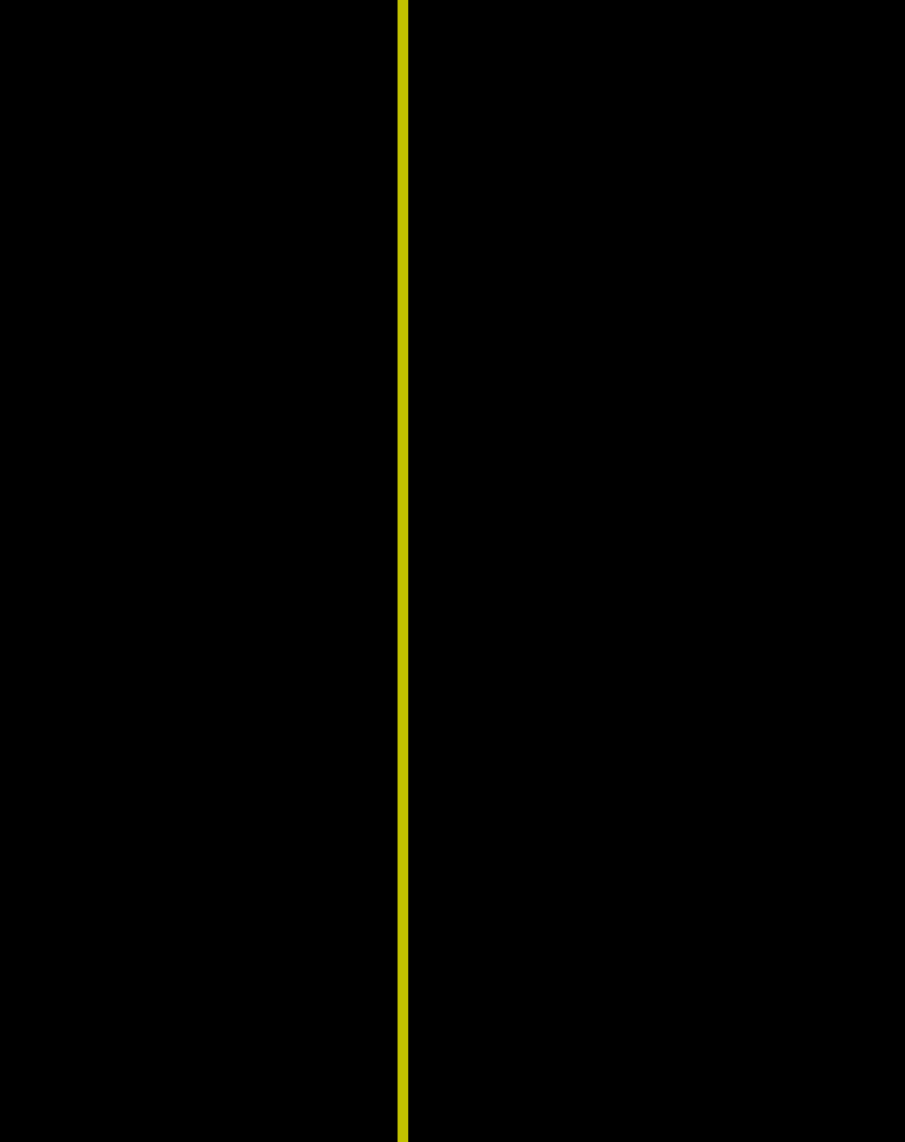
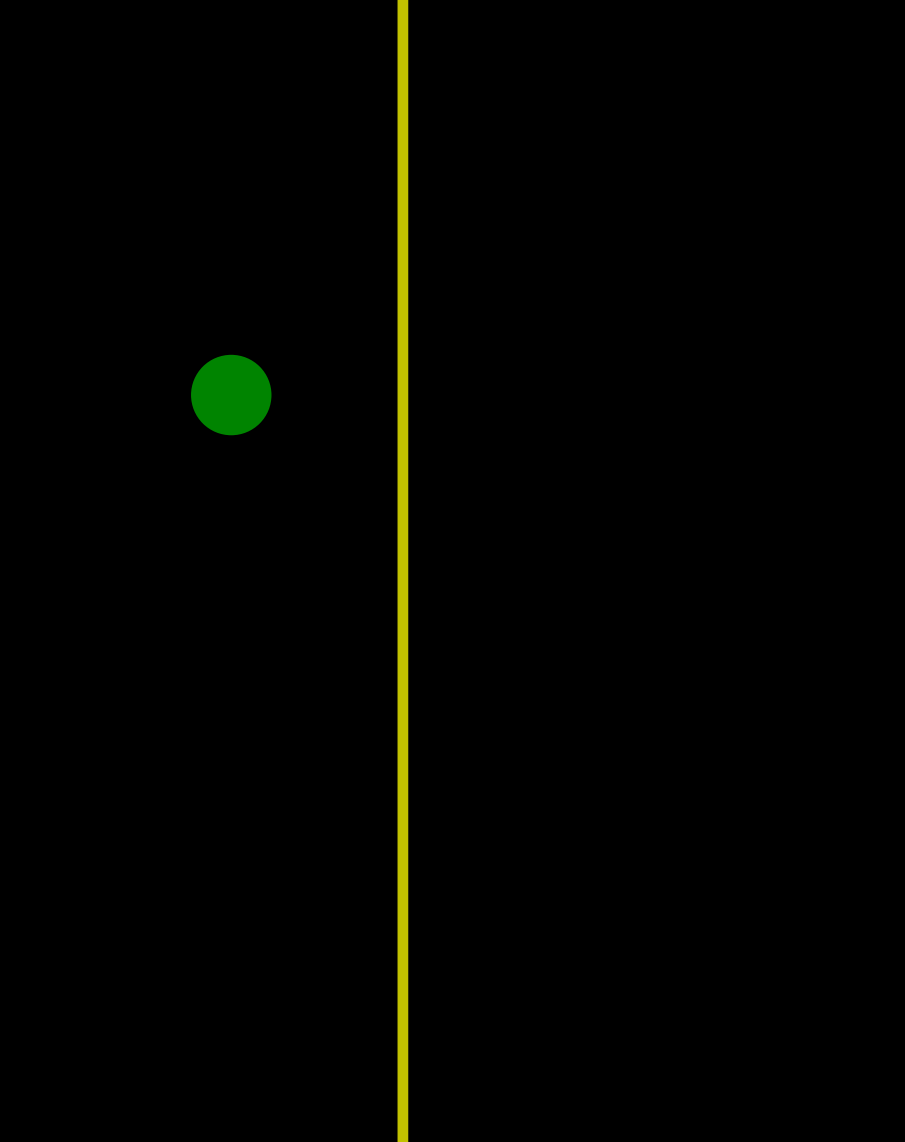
part: none -> (231, 395)

